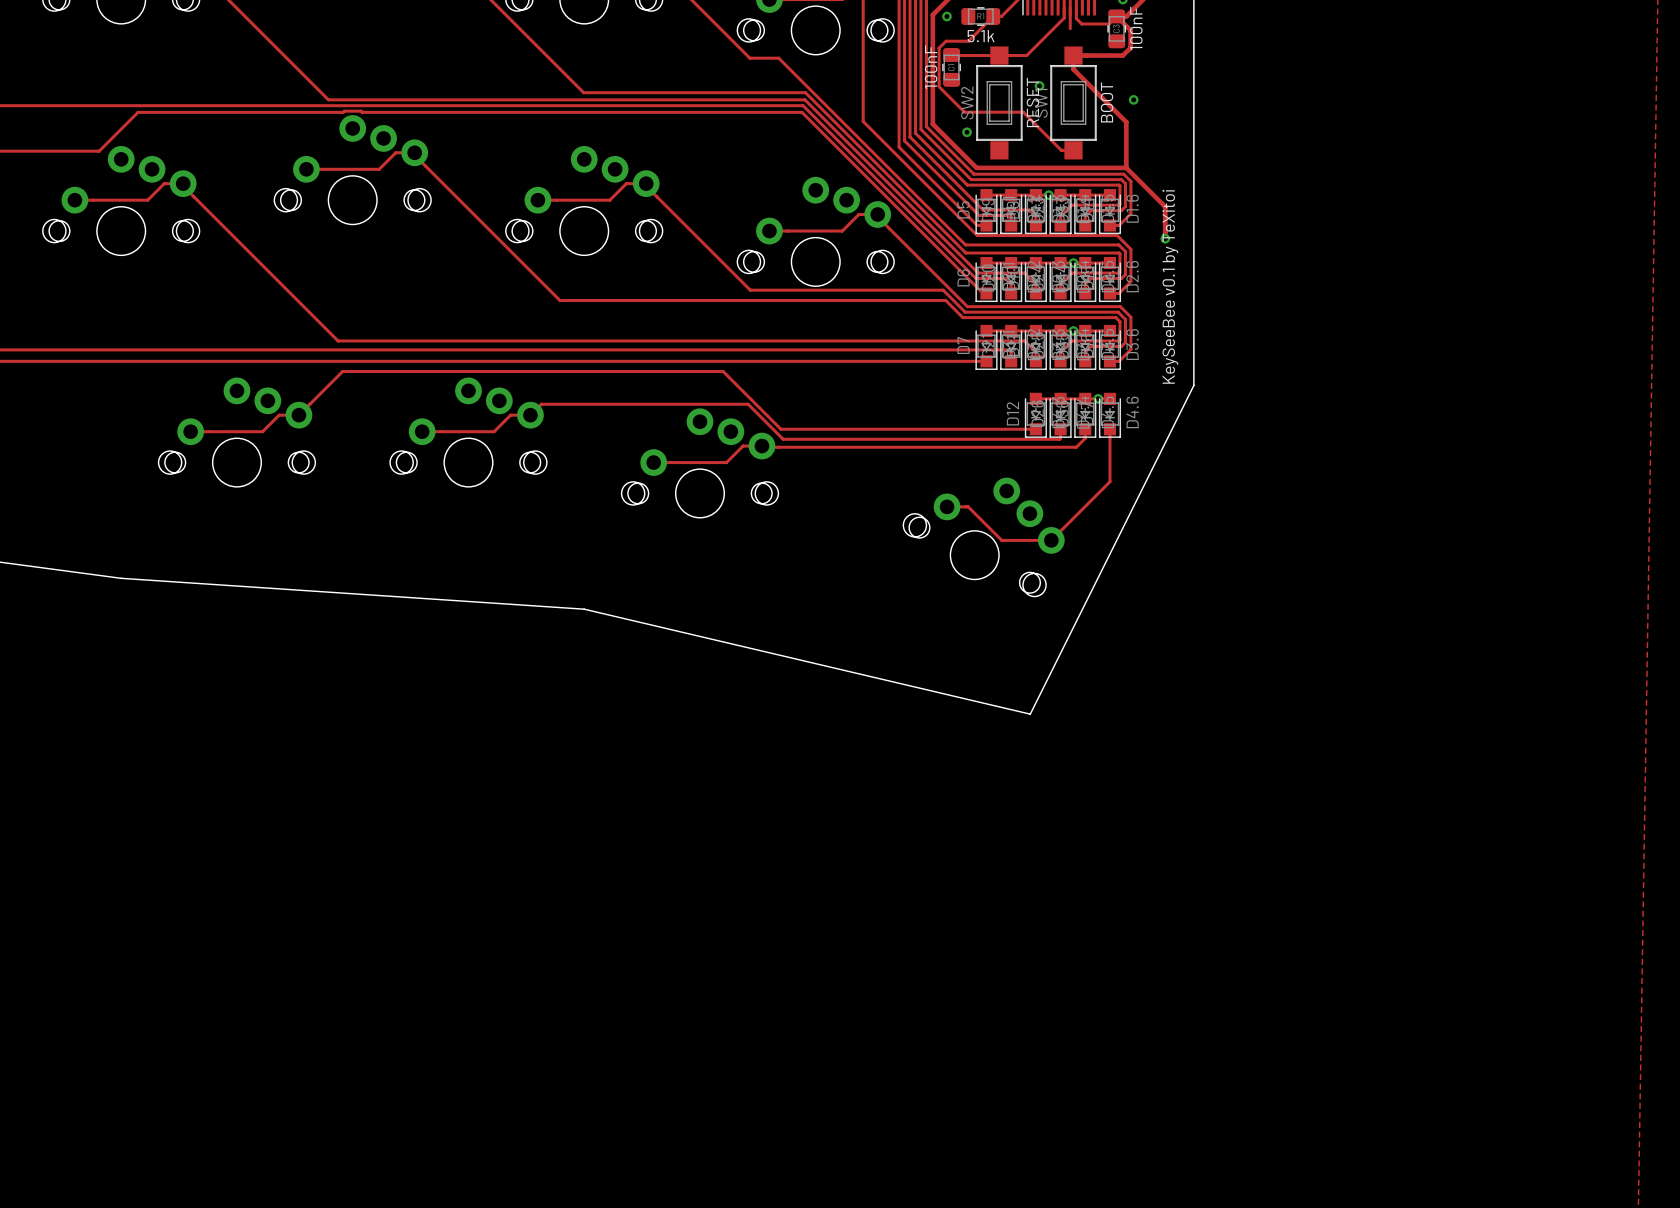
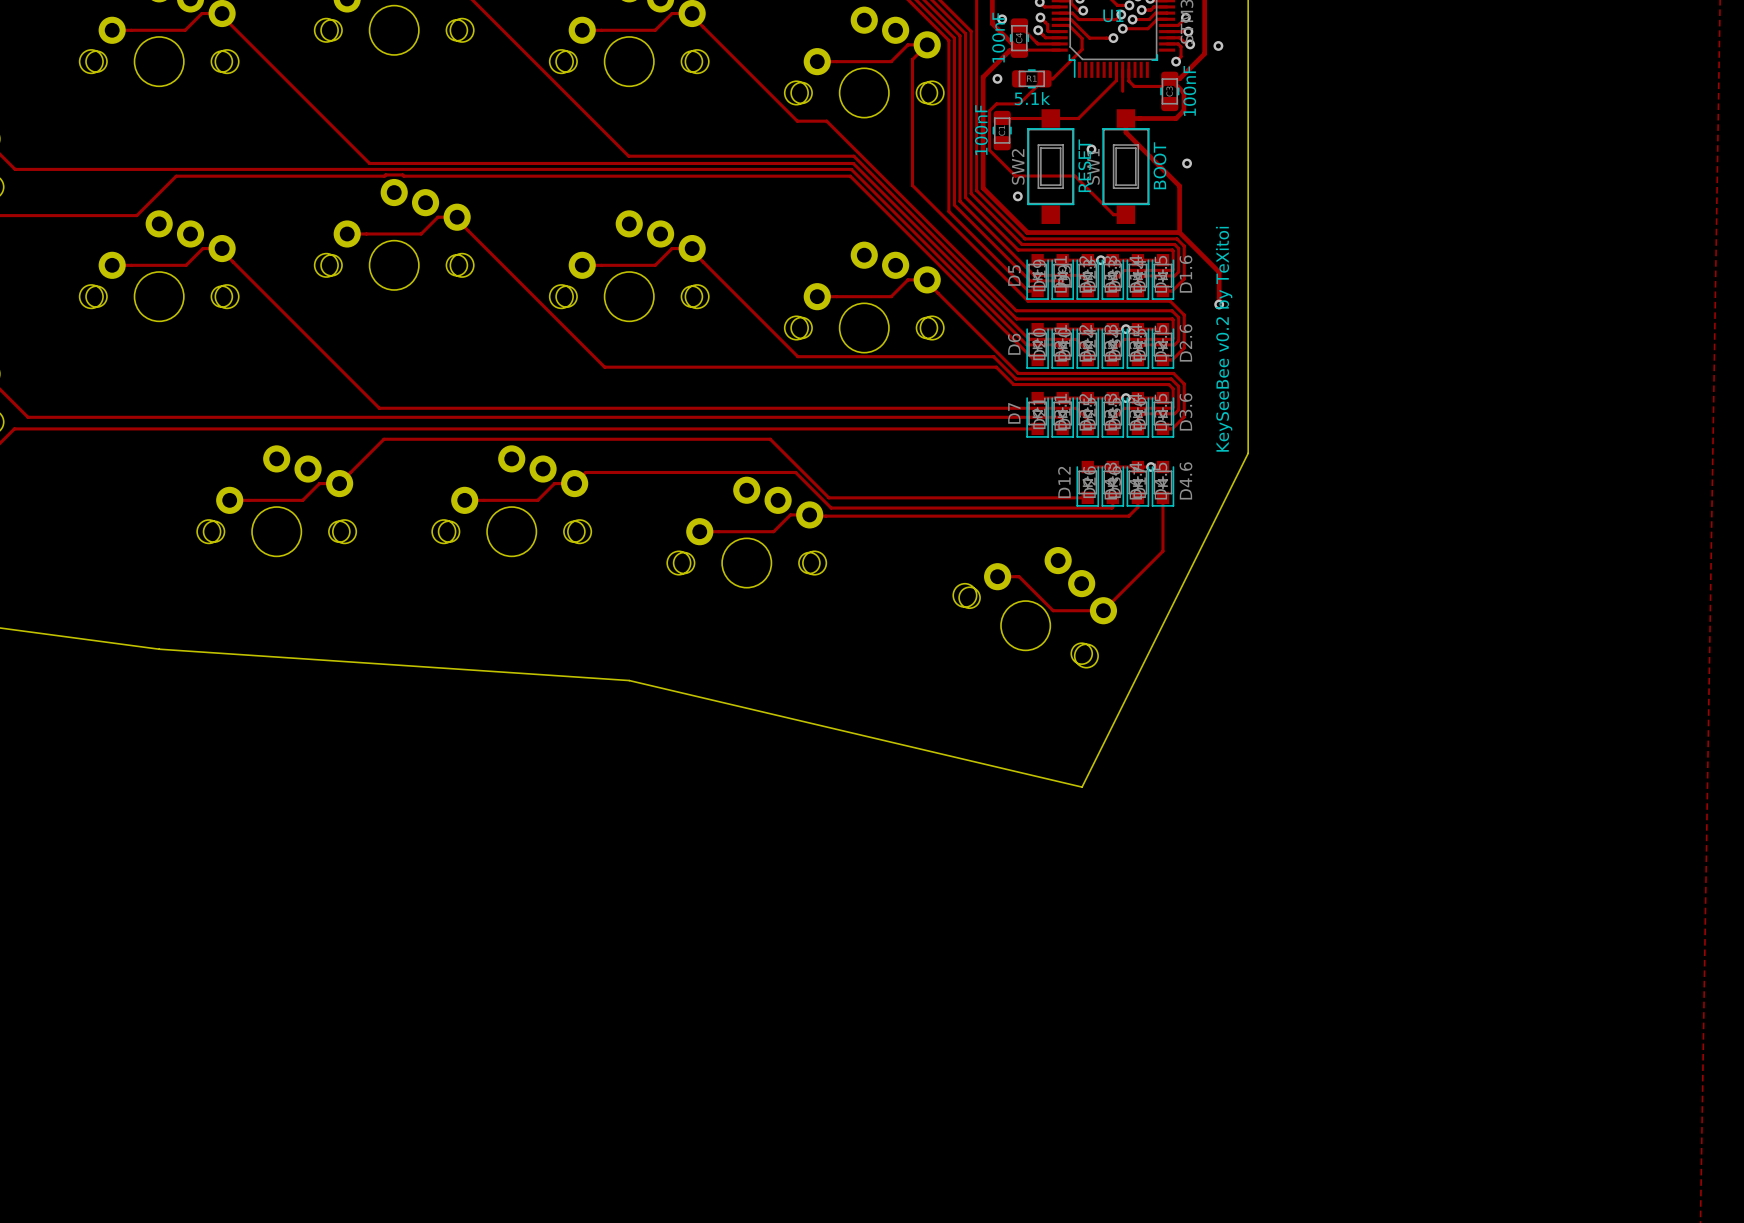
text: KeySeeBee v0.1 by TeXitoi (1170, 286) -> KeySeeBee v0.2 by TeXitoi (1224, 339)

